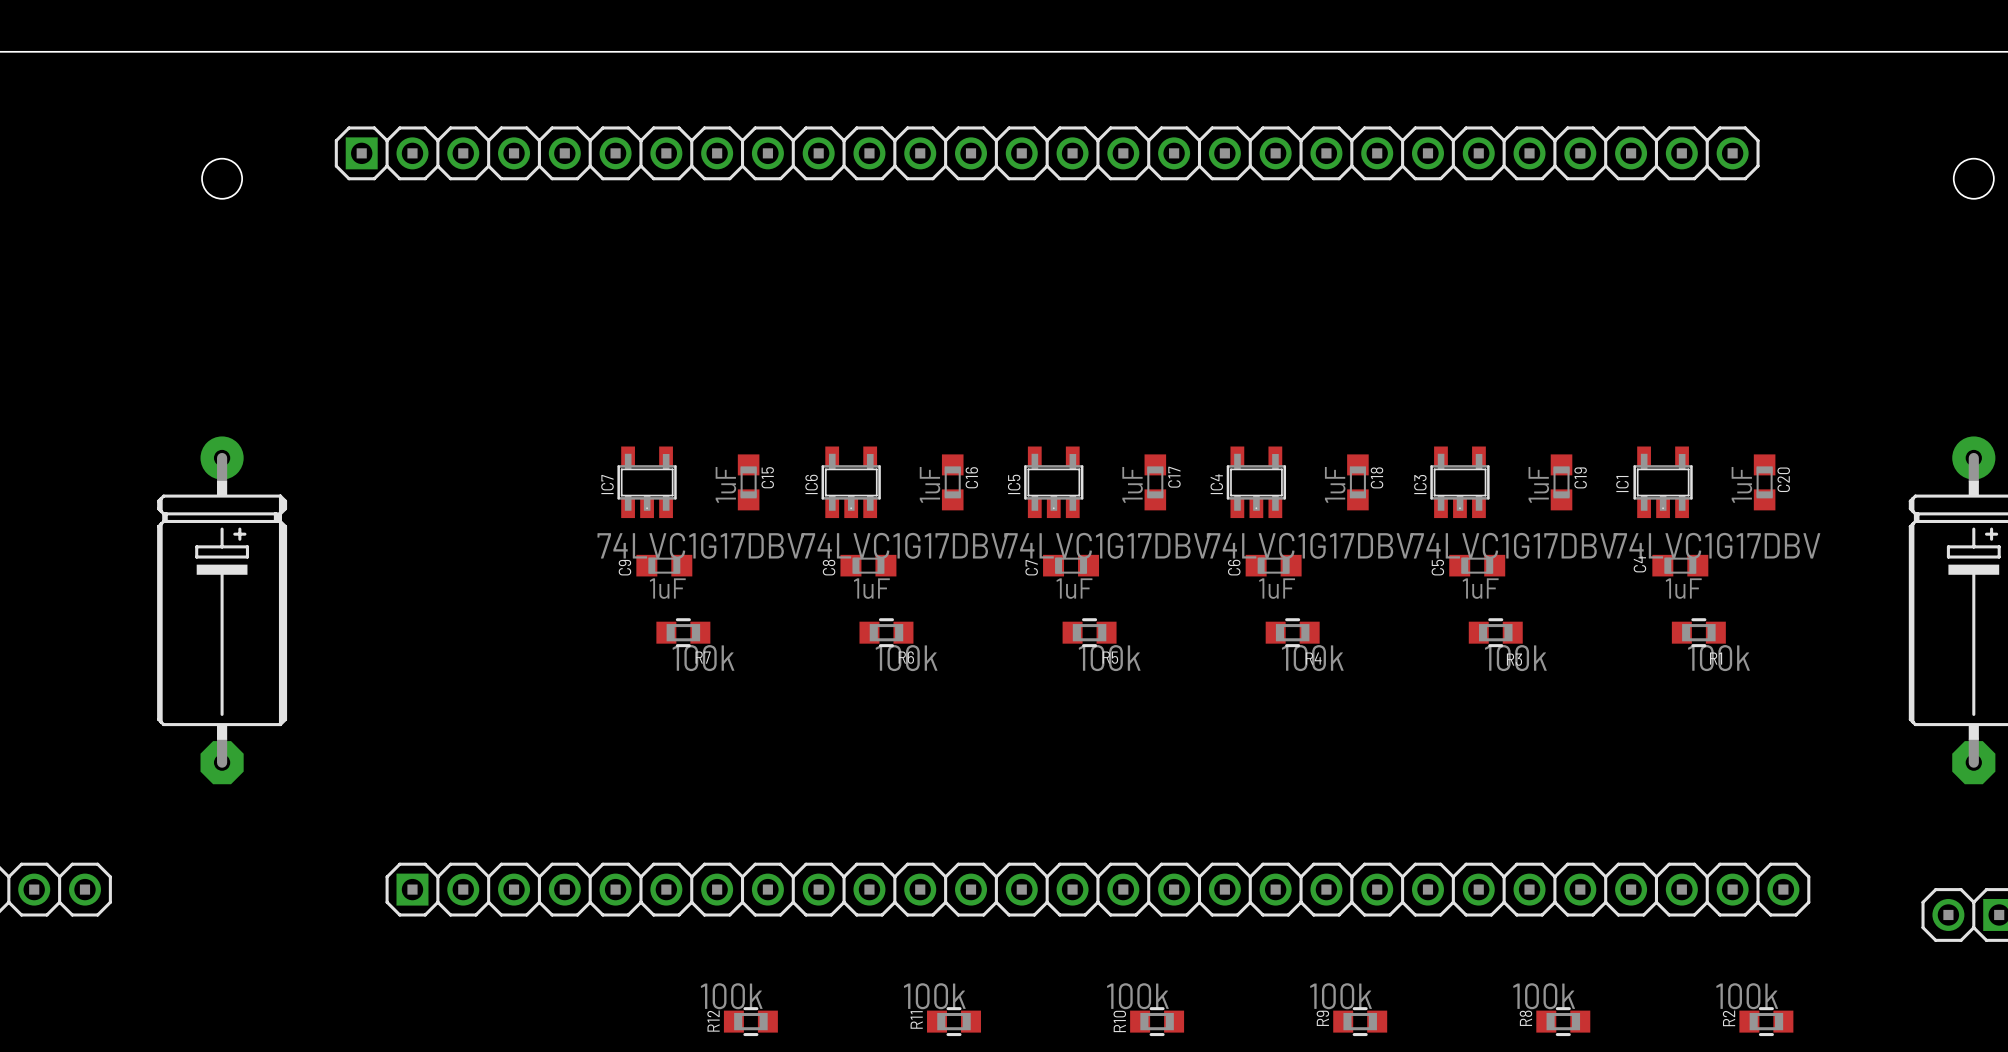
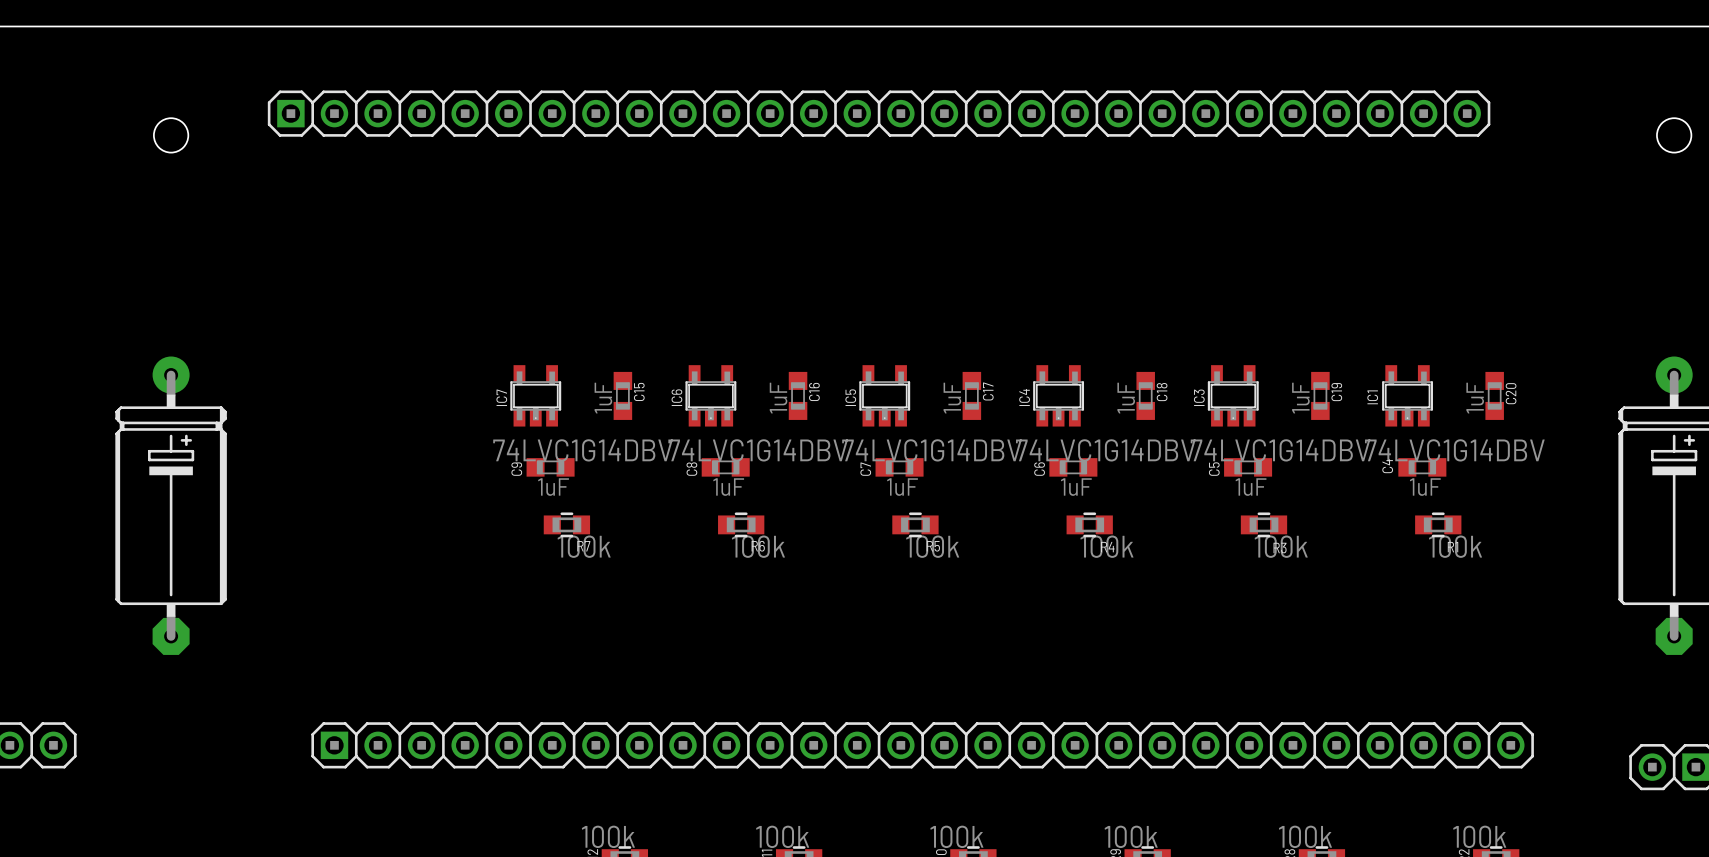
IC7 value: 74LVC1G17DBV (700, 545) -> 74LVC1G14DBV (583, 450)
IC6 value: 74LVC1G17DBV (905, 545) -> 74LVC1G14DBV (758, 450)
IC5 value: 74LVC1G17DBV (1107, 545) -> 74LVC1G14DBV (932, 450)
IC4 value: 74LVC1G17DBV (1310, 545) -> 74LVC1G14DBV (1105, 450)
IC3 value: 74LVC1G17DBV (1513, 545) -> 74LVC1G14DBV (1280, 450)
IC1 value: 74LVC1G17DBV (1716, 545) -> 74LVC1G14DBV (1454, 450)

